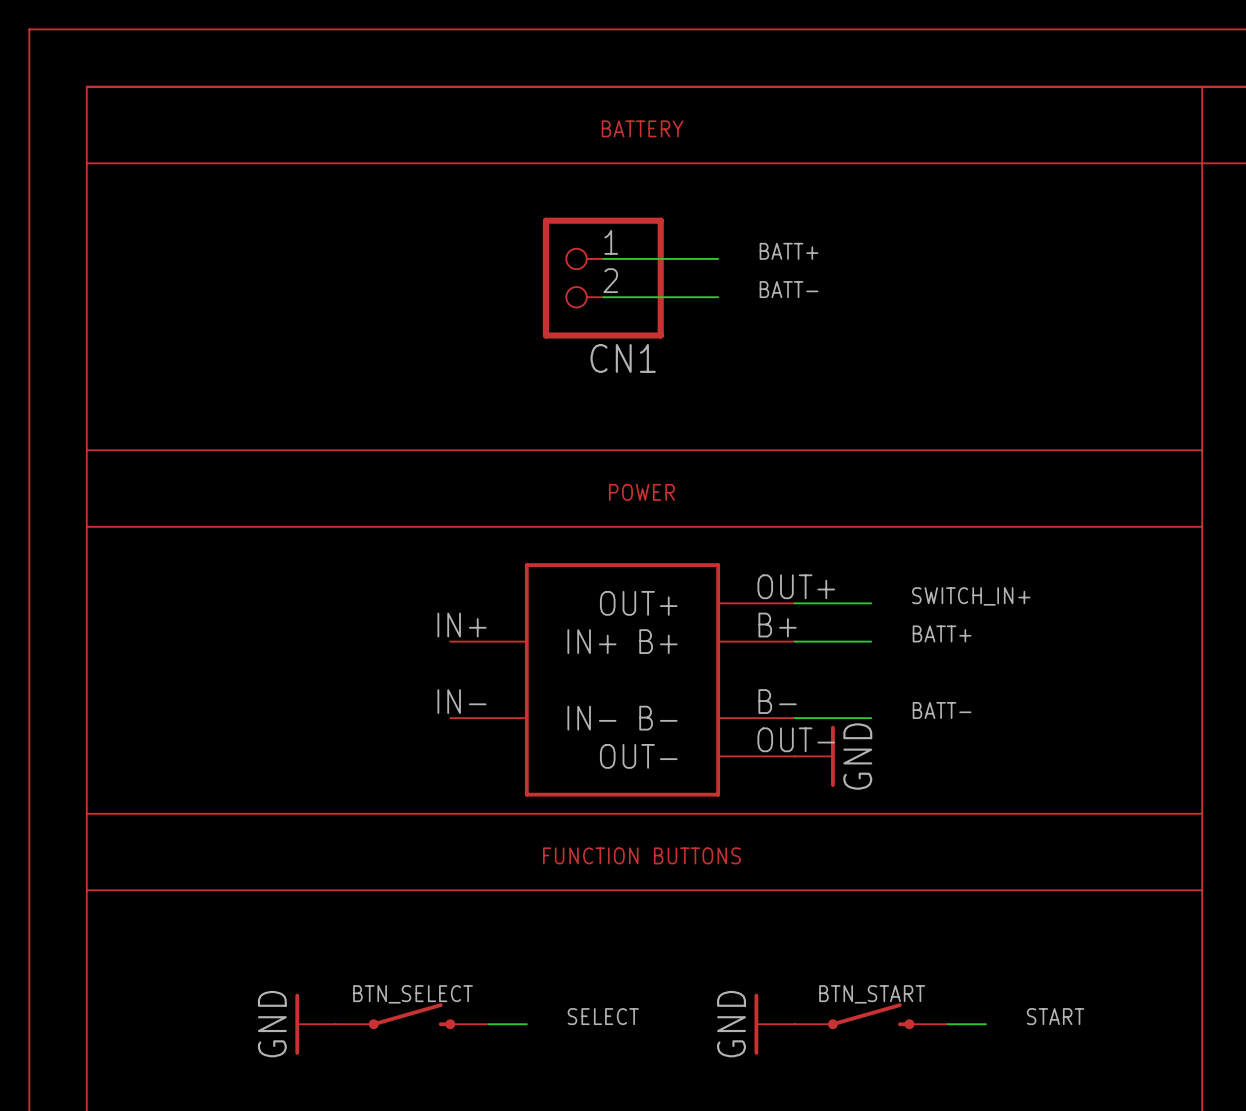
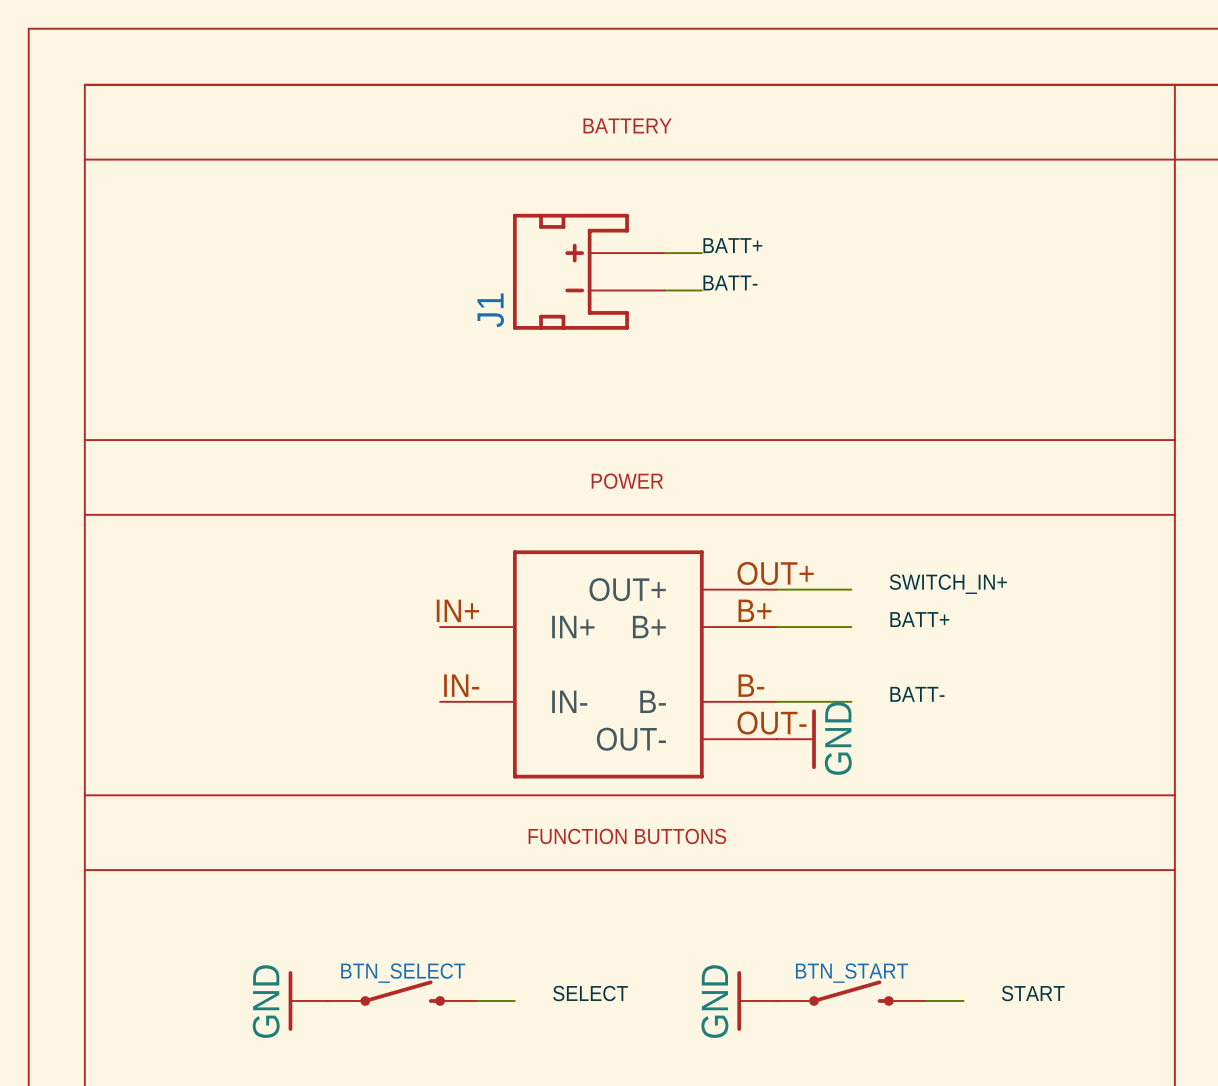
label position: BATT+ (789, 251) -> BATT+ (732, 245)
J1: none -> (588, 271)
CN1: (603, 278) -> none
label position: BATT- (789, 289) -> BATT- (730, 283)

